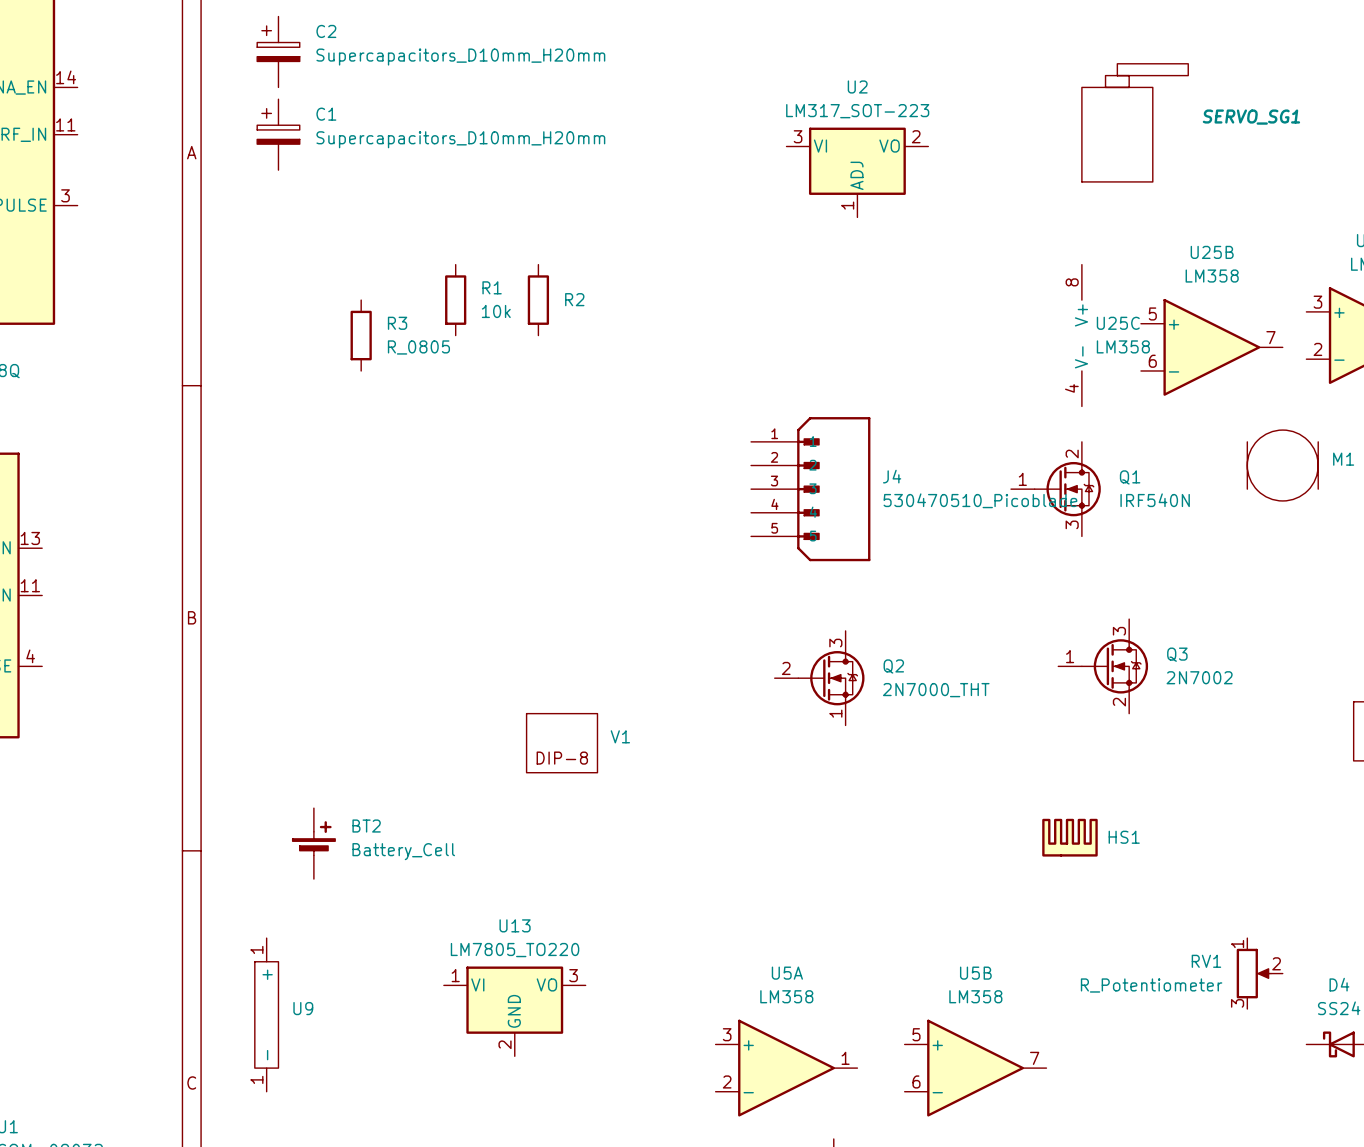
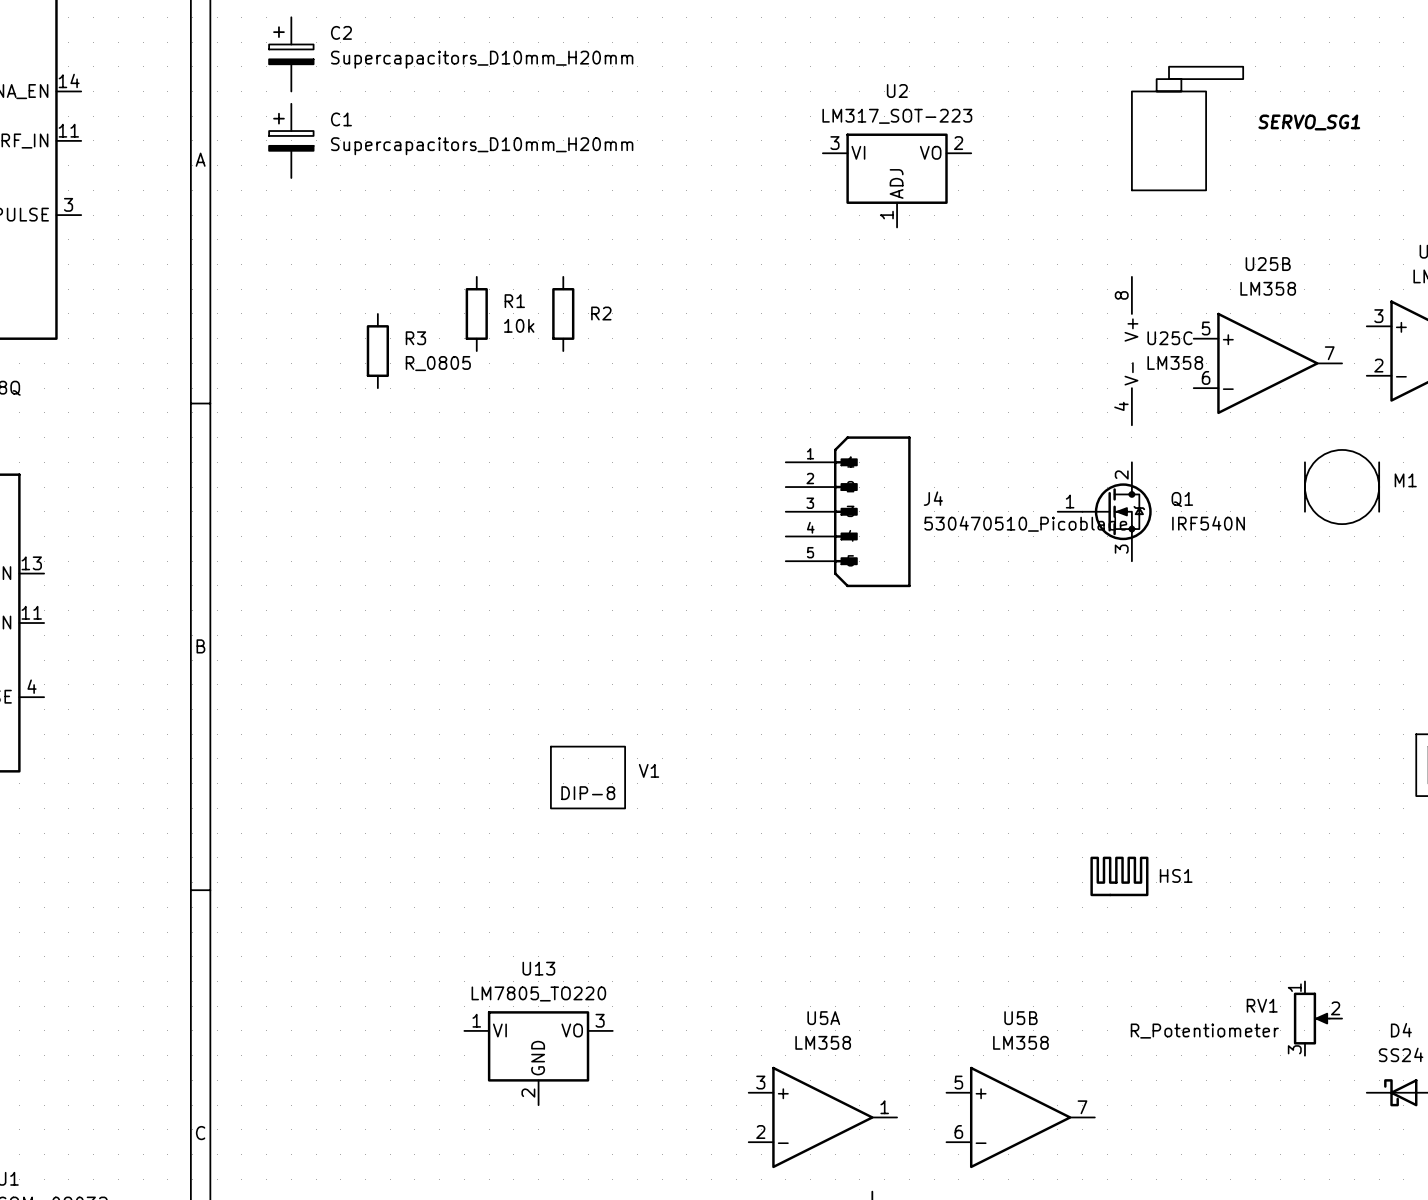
Q3: 2N7002 (1103, 666) -> none
Q2: 2N7000_THT (819, 678) -> none
BT2: Battery_Cell (313, 843) -> none
U9: (266, 1014) -> none

